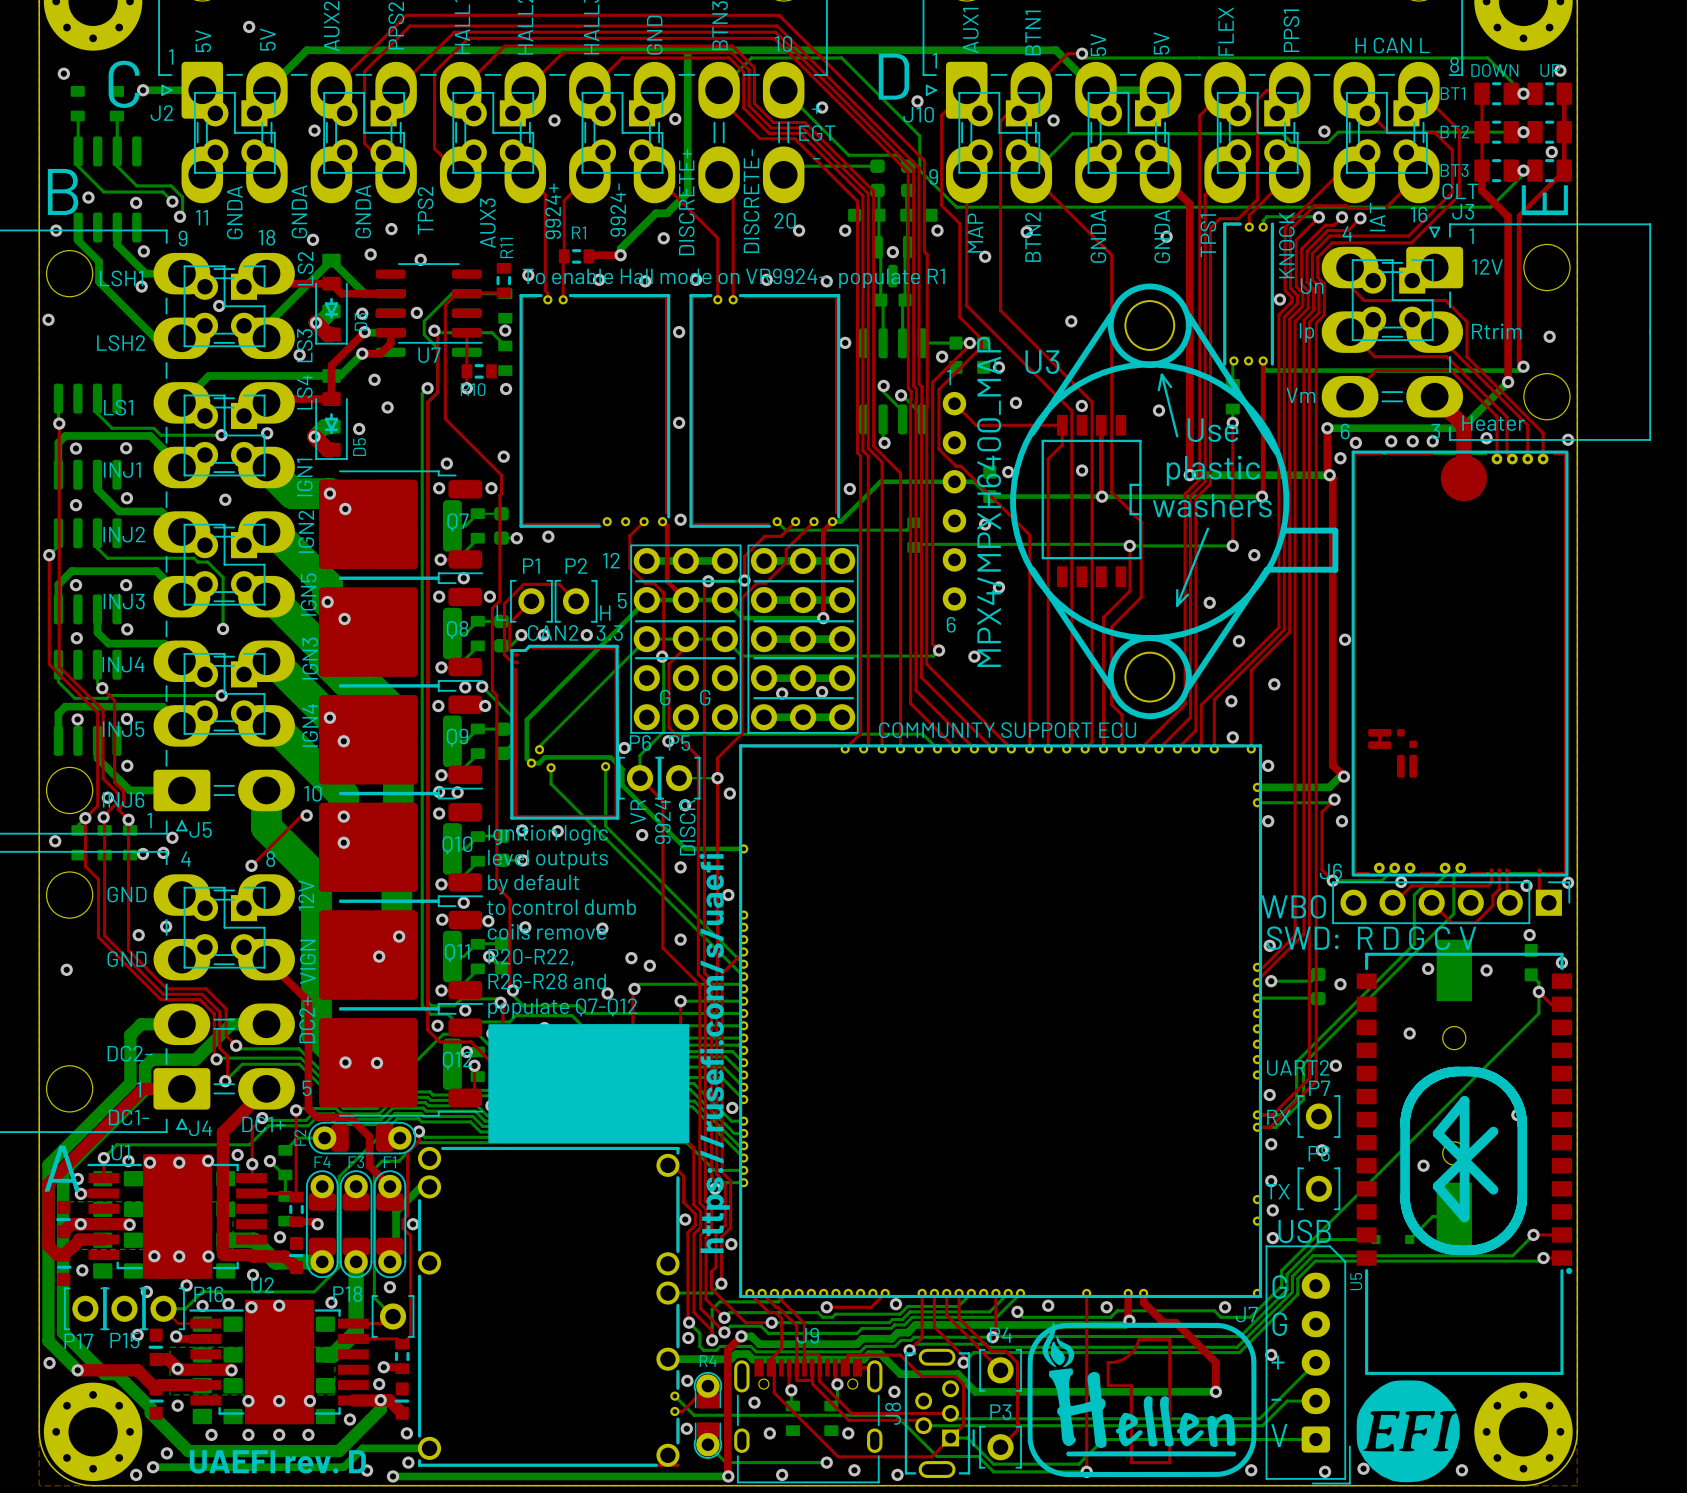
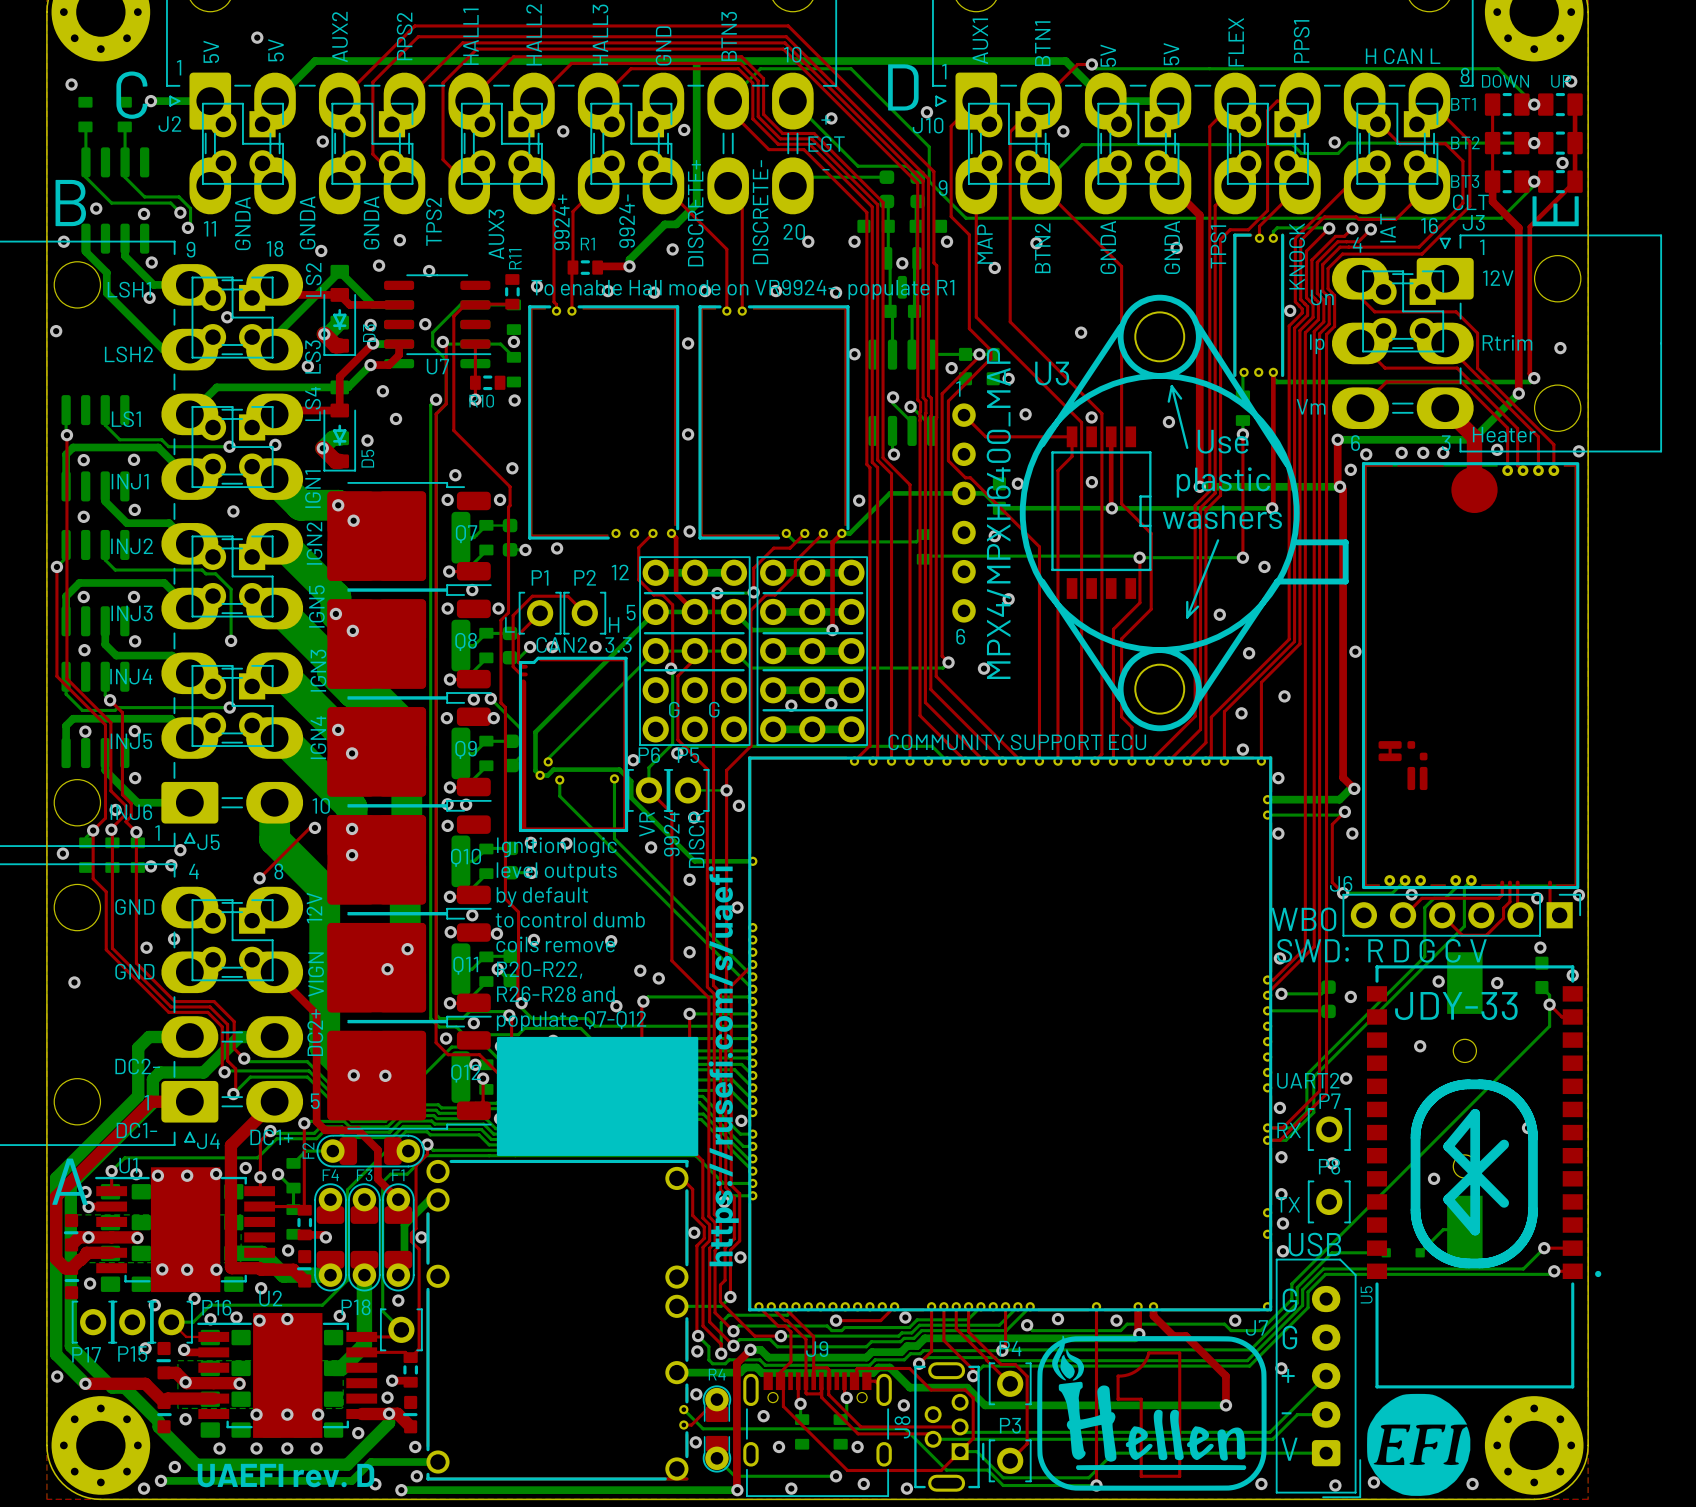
U5 footprint: [1356, 952, 1573, 1375] -> [1366, 965, 1602, 1389]

